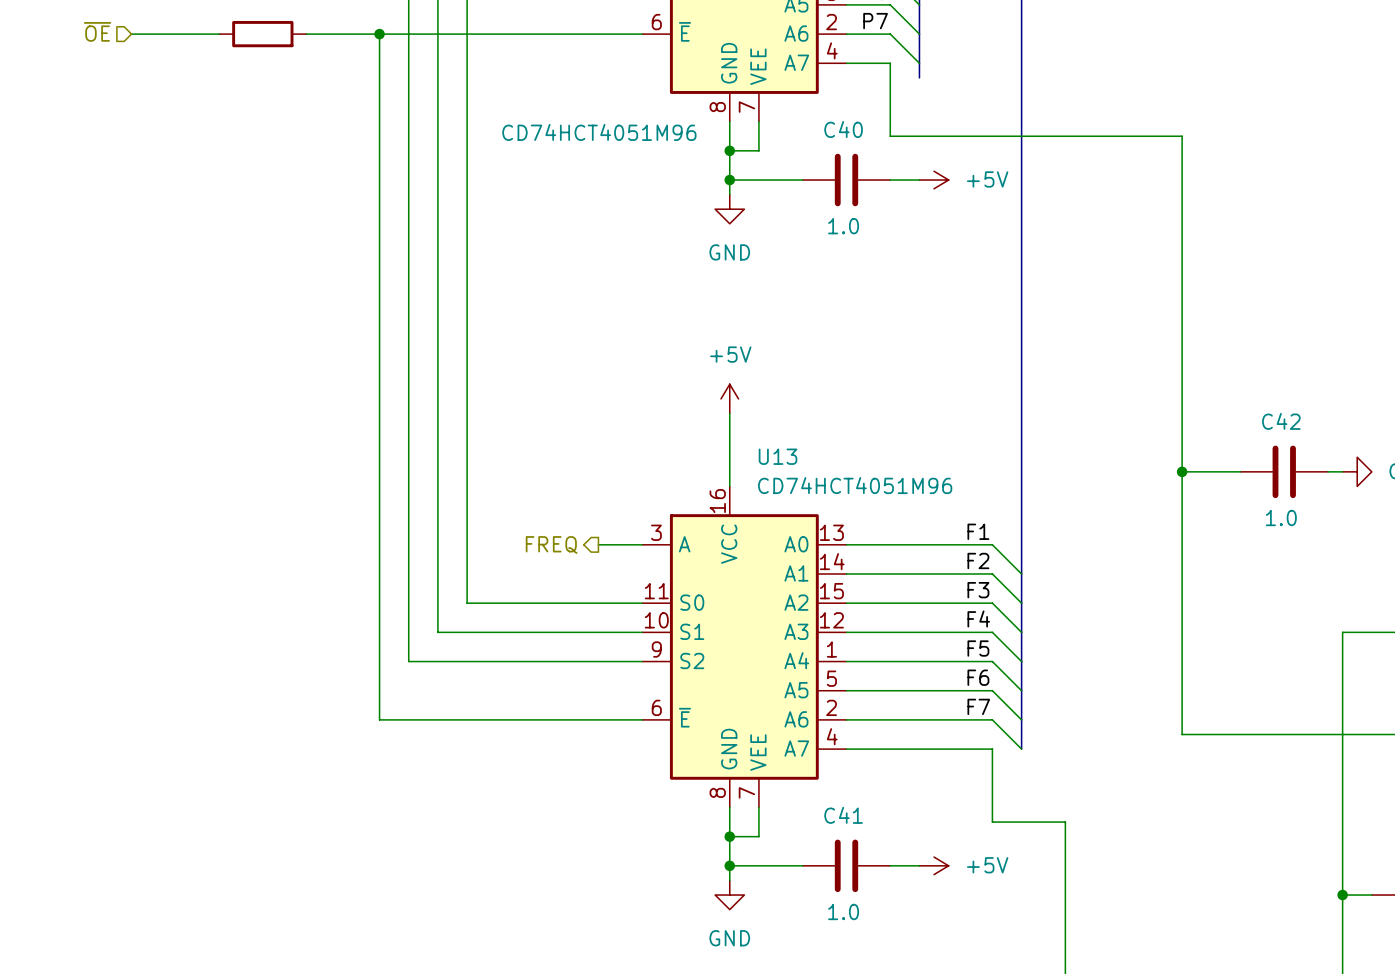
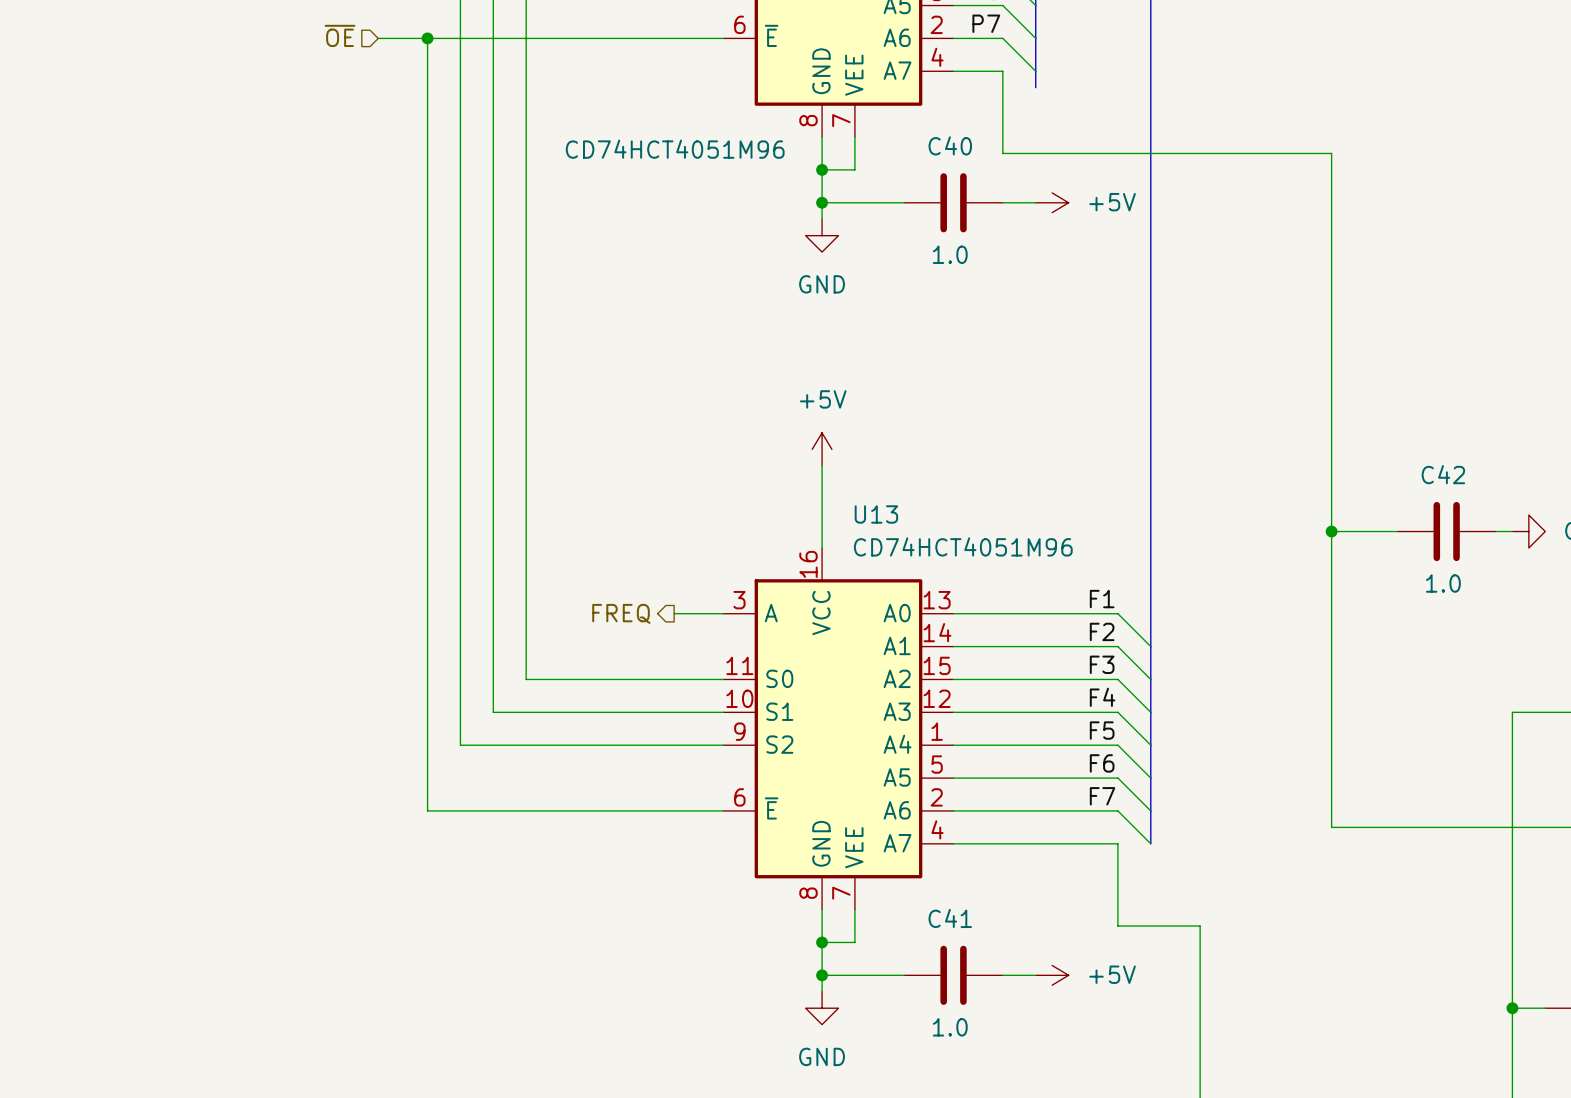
hierarchical label position: ~{OE} (97, 31) -> ~{OE} (340, 35)
wire: (131, 34) (219, 34) -> none
part: (262, 34) -> none
wire: (306, 34) (335, 34) -> none

